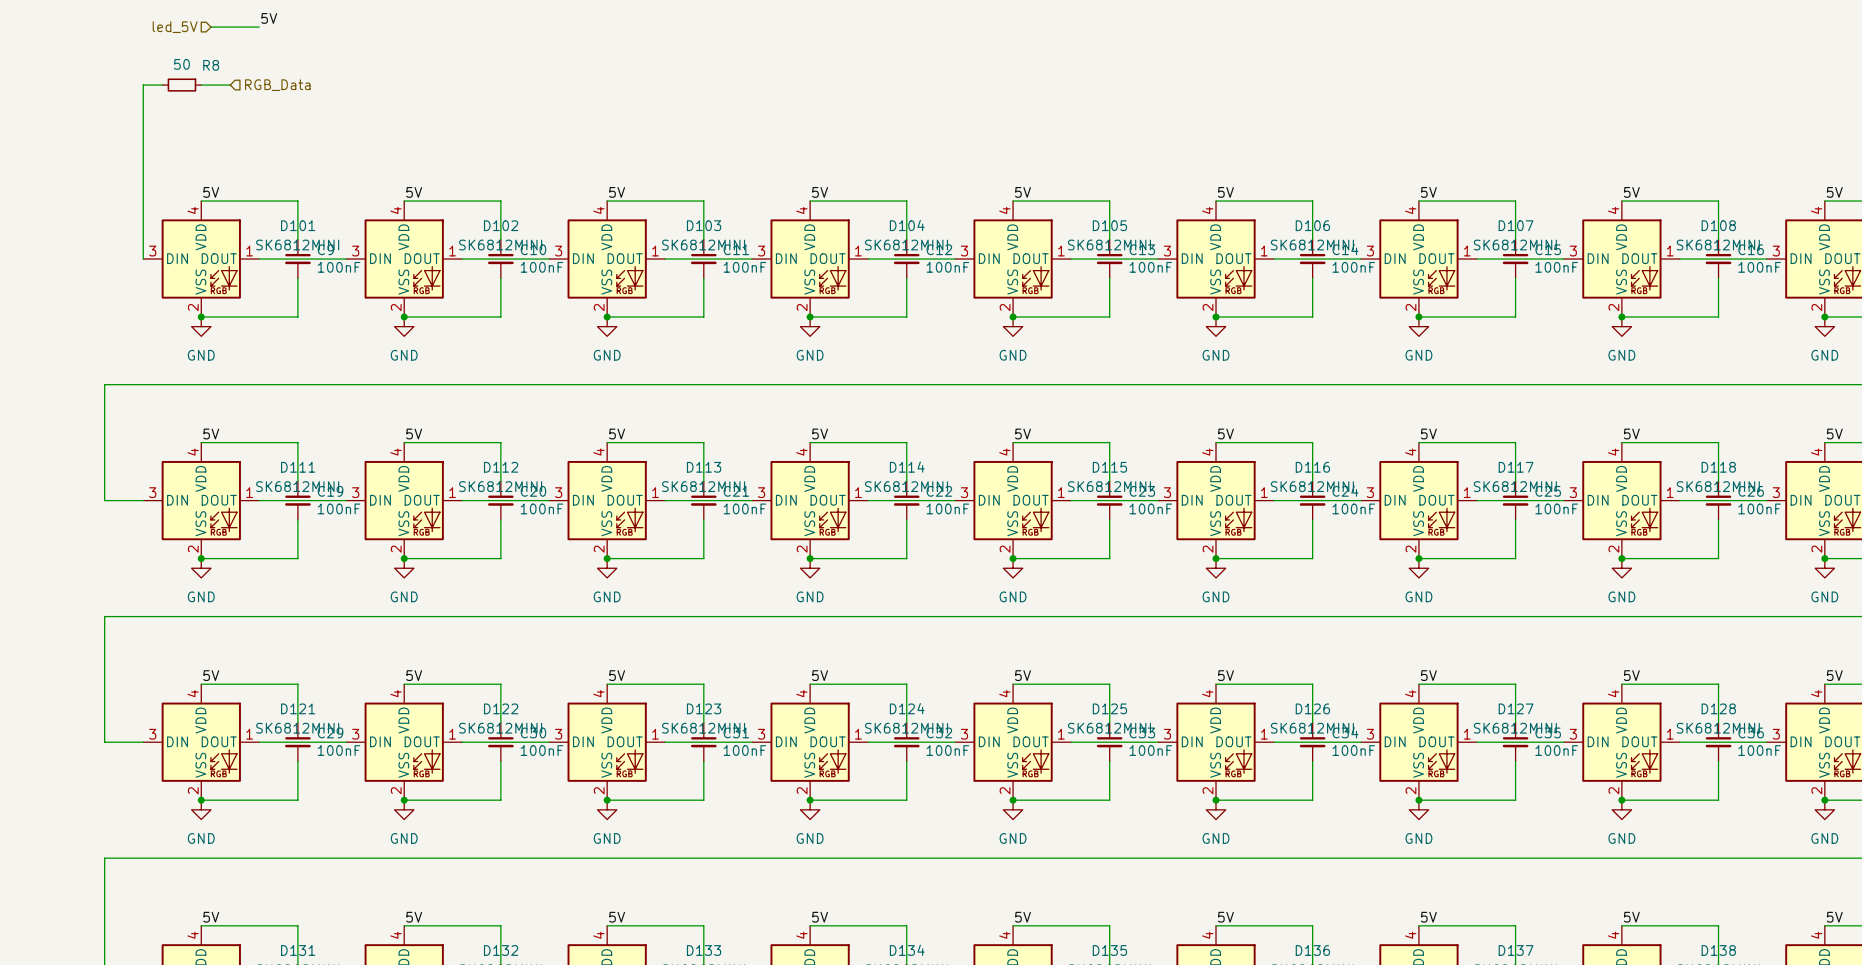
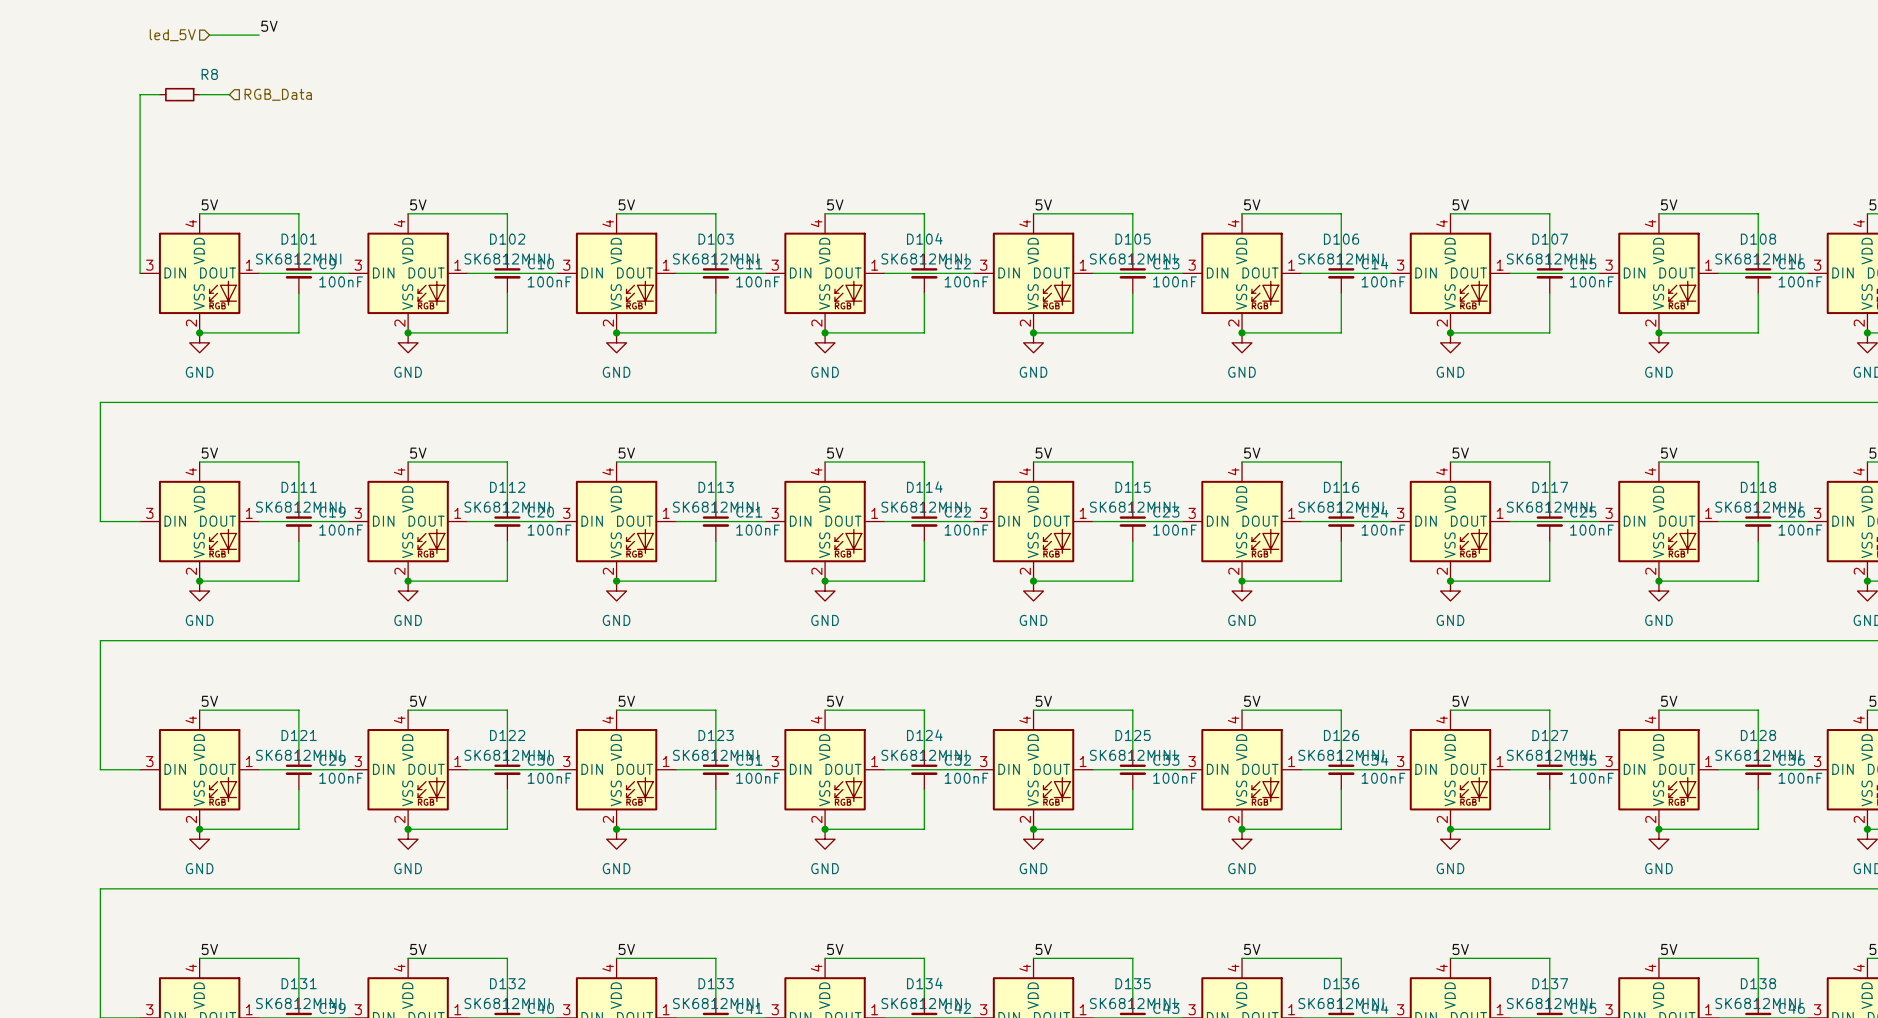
R8 value: 50 (181, 64) -> none

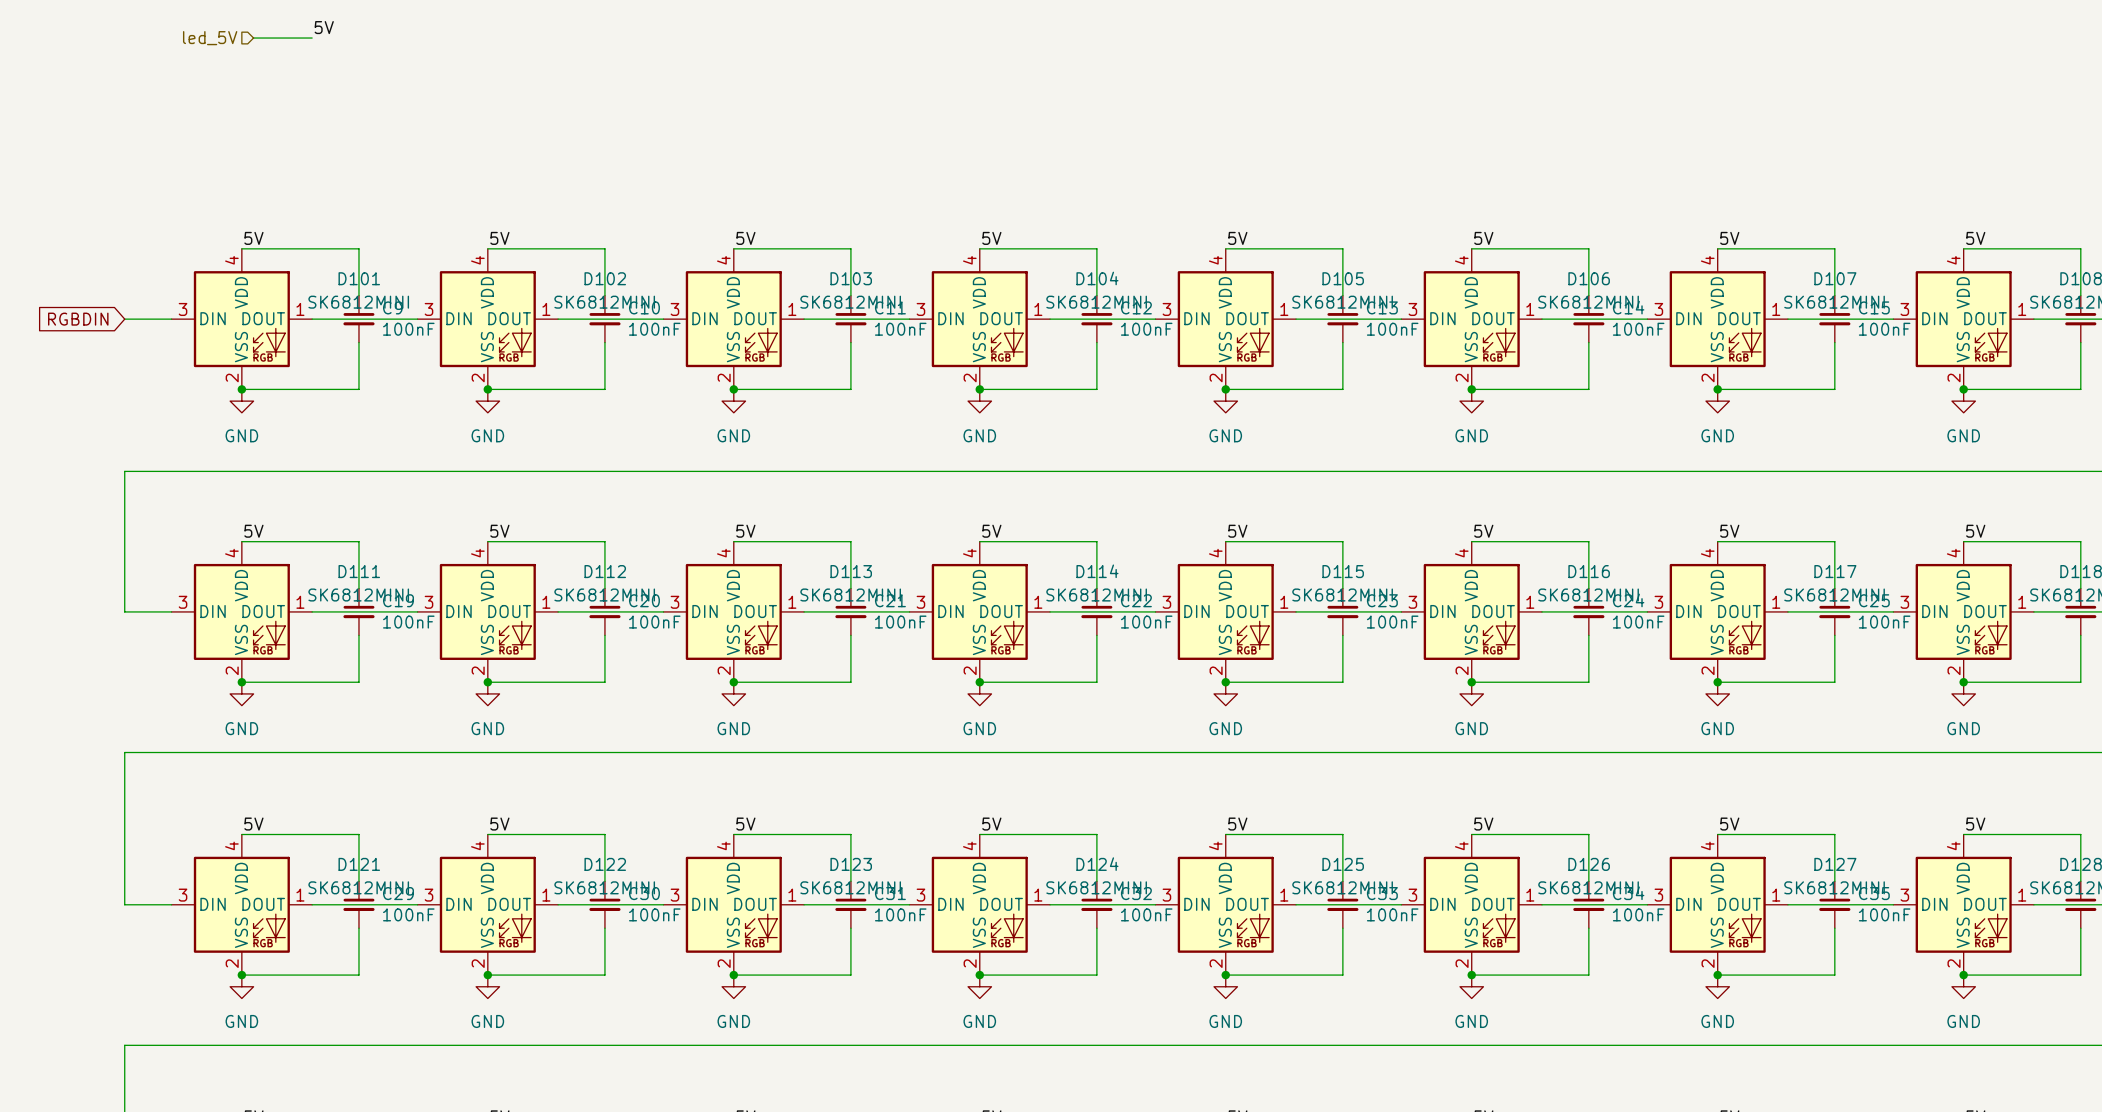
wire: (159, 94) (140, 94) (140, 273) -> (124, 319) (171, 319)
R8: (179, 94) -> none
wire: (199, 94) (229, 94) -> none
hierarchical label: RGB_Data (278, 94) -> none
global label: none -> RGBDIN (78, 319)

